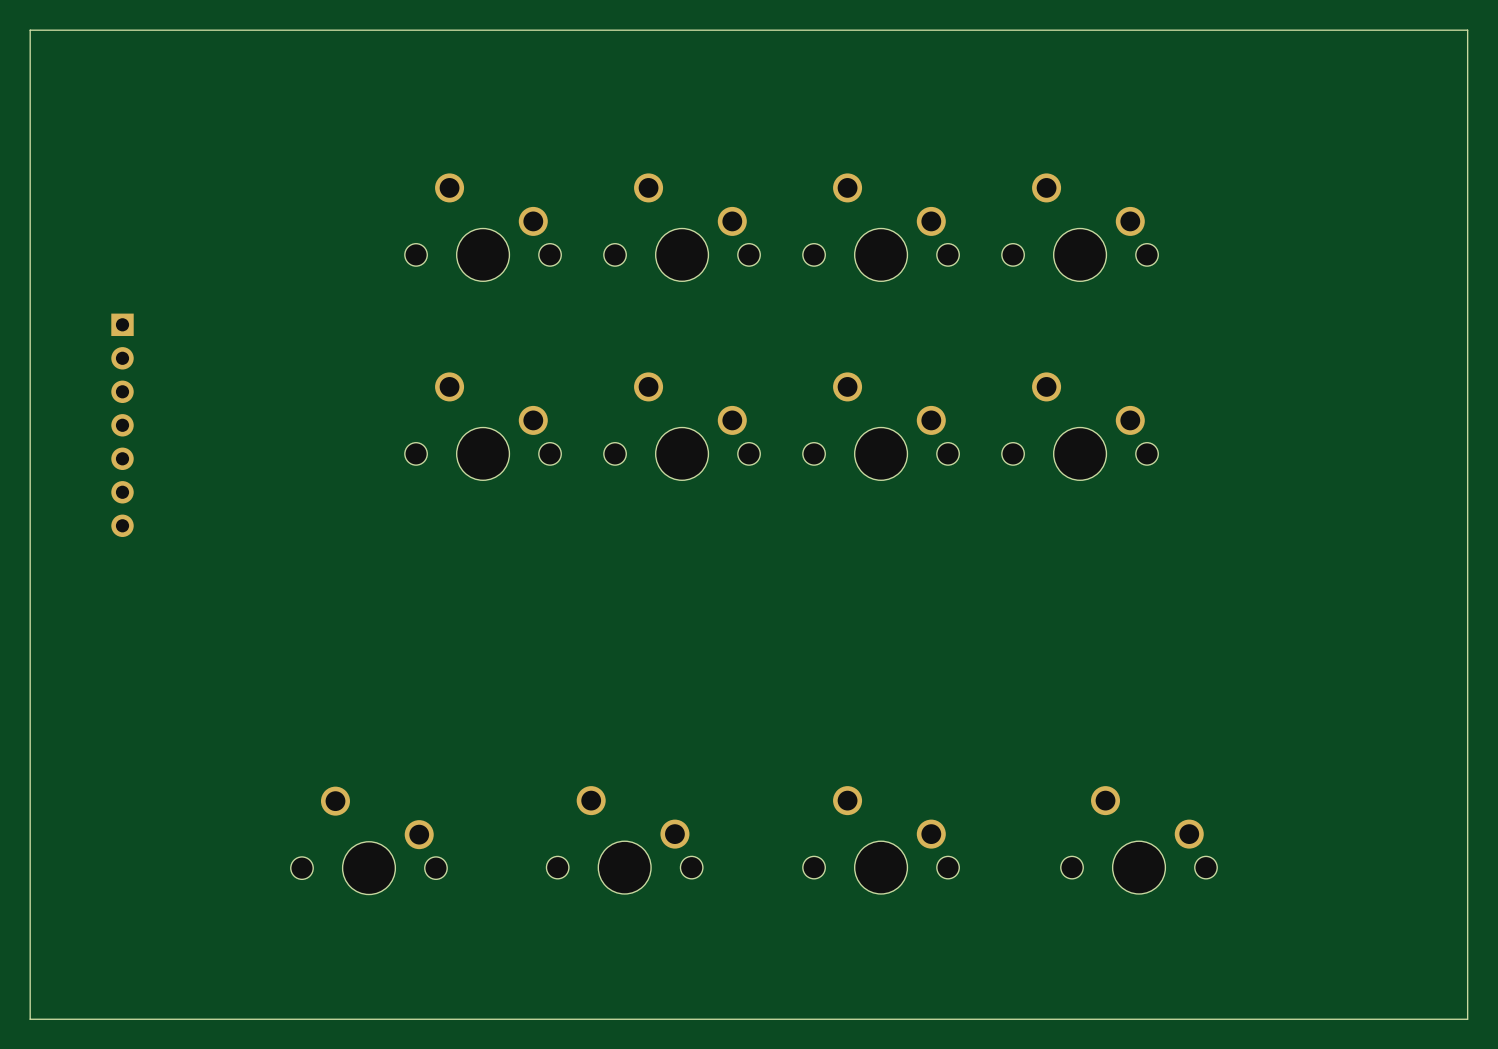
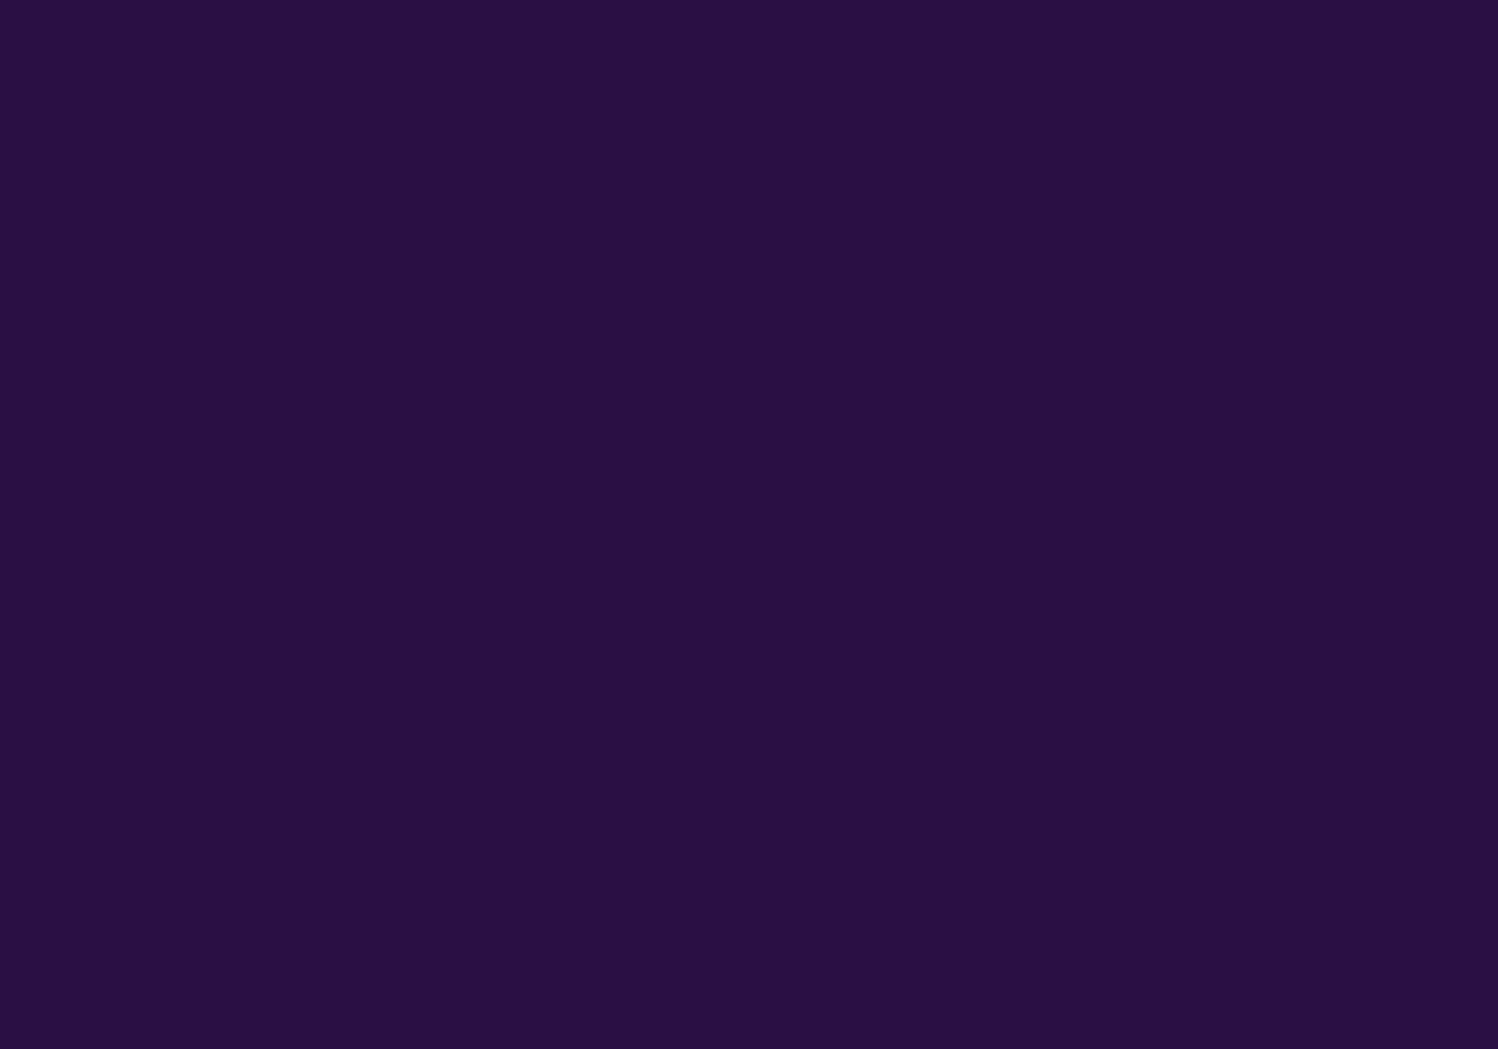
board edge: (1467, 30) (30, 30) (30, 1019) (1467, 1019) (1467, 30) -> none
part: (483, 227) -> none
part: (682, 227) -> none
part: (881, 227) -> none
part: (1080, 227) -> none
part: (122, 425) -> none
part: (483, 426) -> none
part: (682, 426) -> none
part: (881, 426) -> none
part: (1080, 426) -> none
part: (368, 840) -> none
part: (624, 840) -> none
part: (881, 840) -> none
part: (1139, 840) -> none

